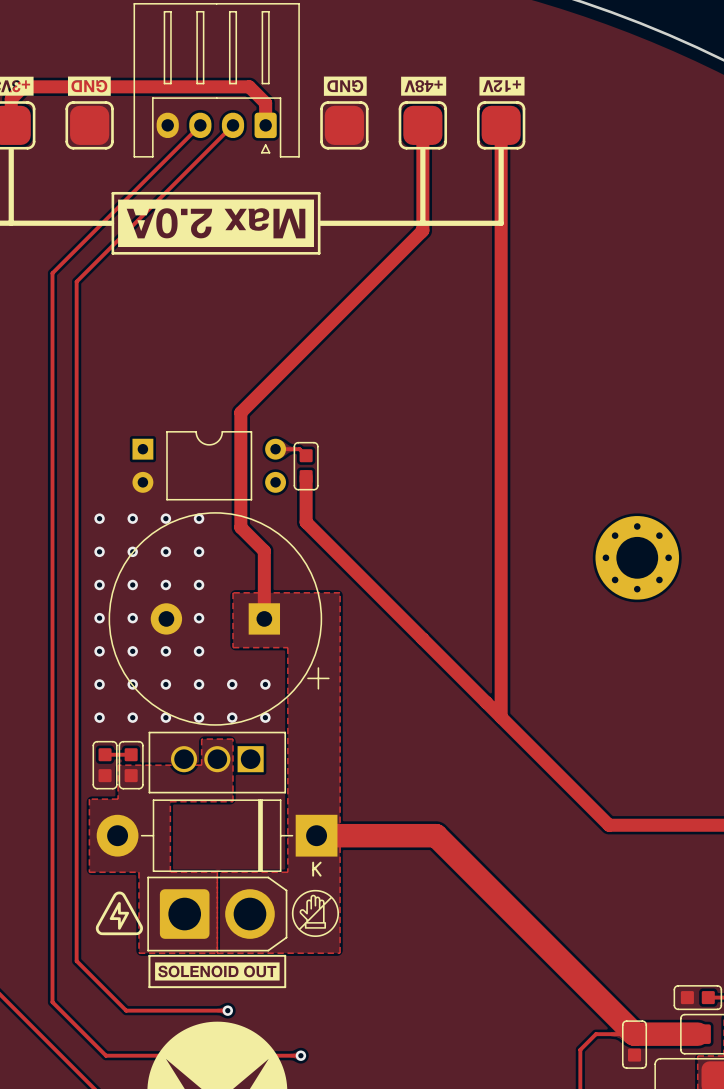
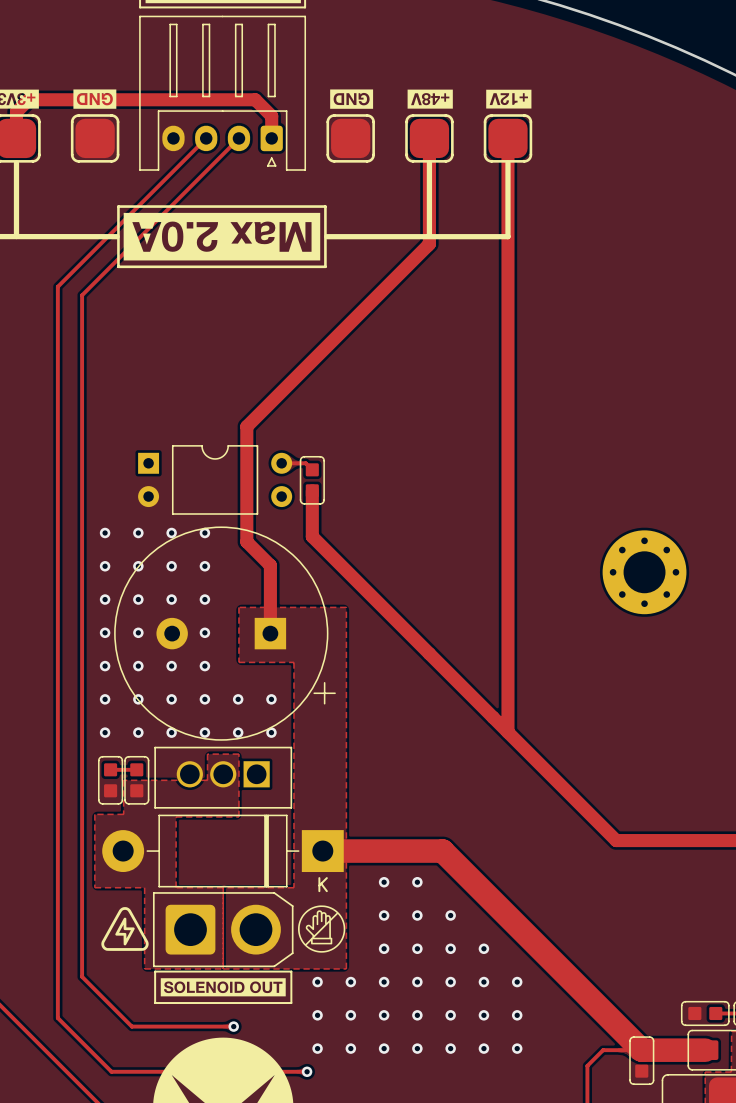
via: none -> (384, 882)
via: none -> (417, 882)
via: none -> (384, 915)
via: none -> (417, 915)
via: none -> (450, 915)
via: none -> (384, 948)
via: none -> (417, 948)
via: none -> (450, 948)
via: none -> (483, 948)
via: none -> (317, 982)
via: none -> (350, 982)
via: none -> (384, 982)
via: none -> (417, 982)
via: none -> (450, 982)
via: none -> (483, 982)
via: none -> (517, 982)
via: none -> (317, 1015)
via: none -> (350, 1015)
via: none -> (384, 1015)
via: none -> (417, 1015)
via: none -> (450, 1015)
via: none -> (483, 1015)
via: none -> (517, 1015)
via: none -> (317, 1048)
via: none -> (350, 1048)
via: none -> (384, 1048)
via: none -> (417, 1048)
via: none -> (450, 1048)
via: none -> (483, 1048)
via: none -> (517, 1048)

